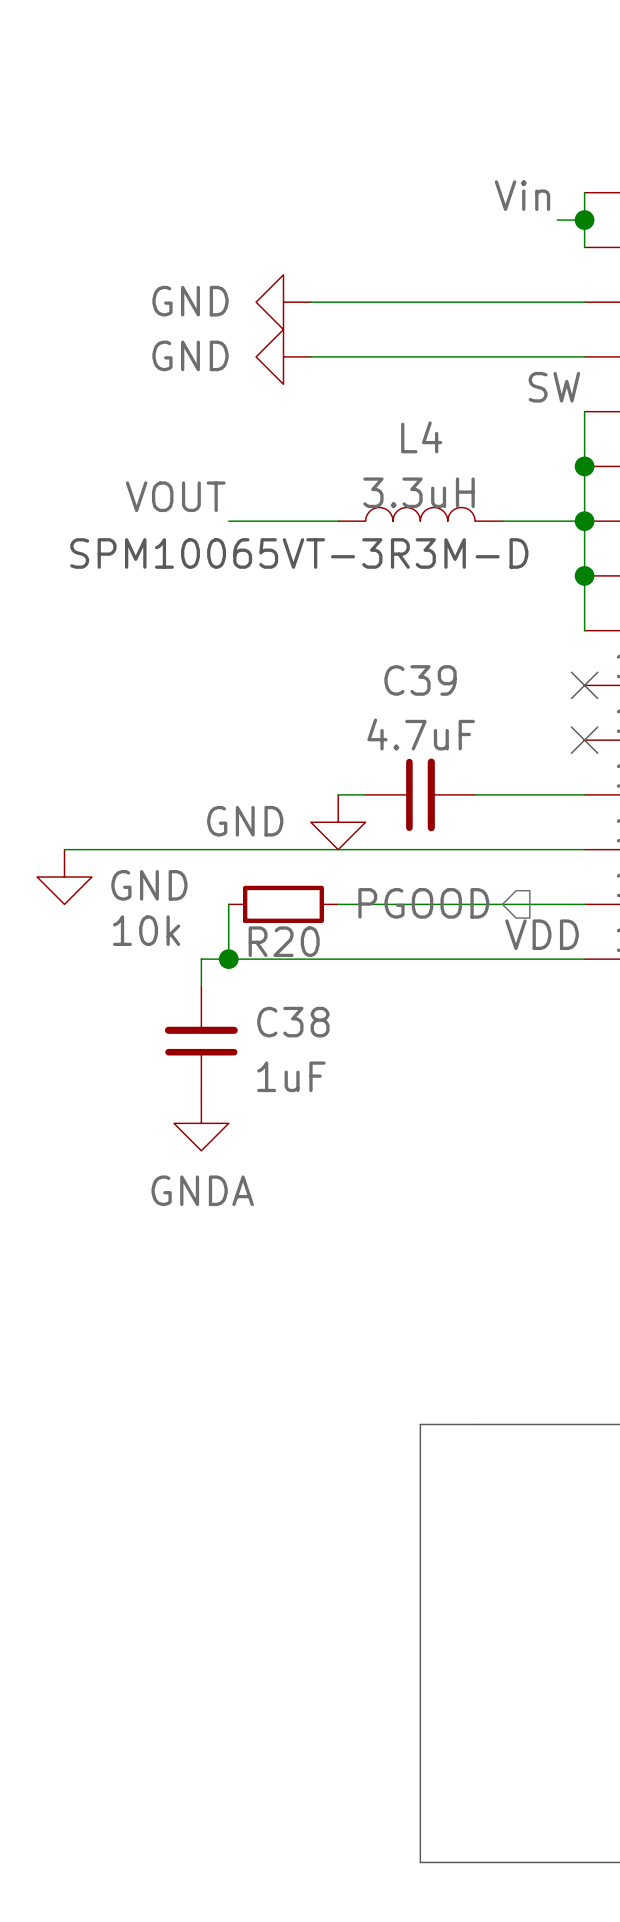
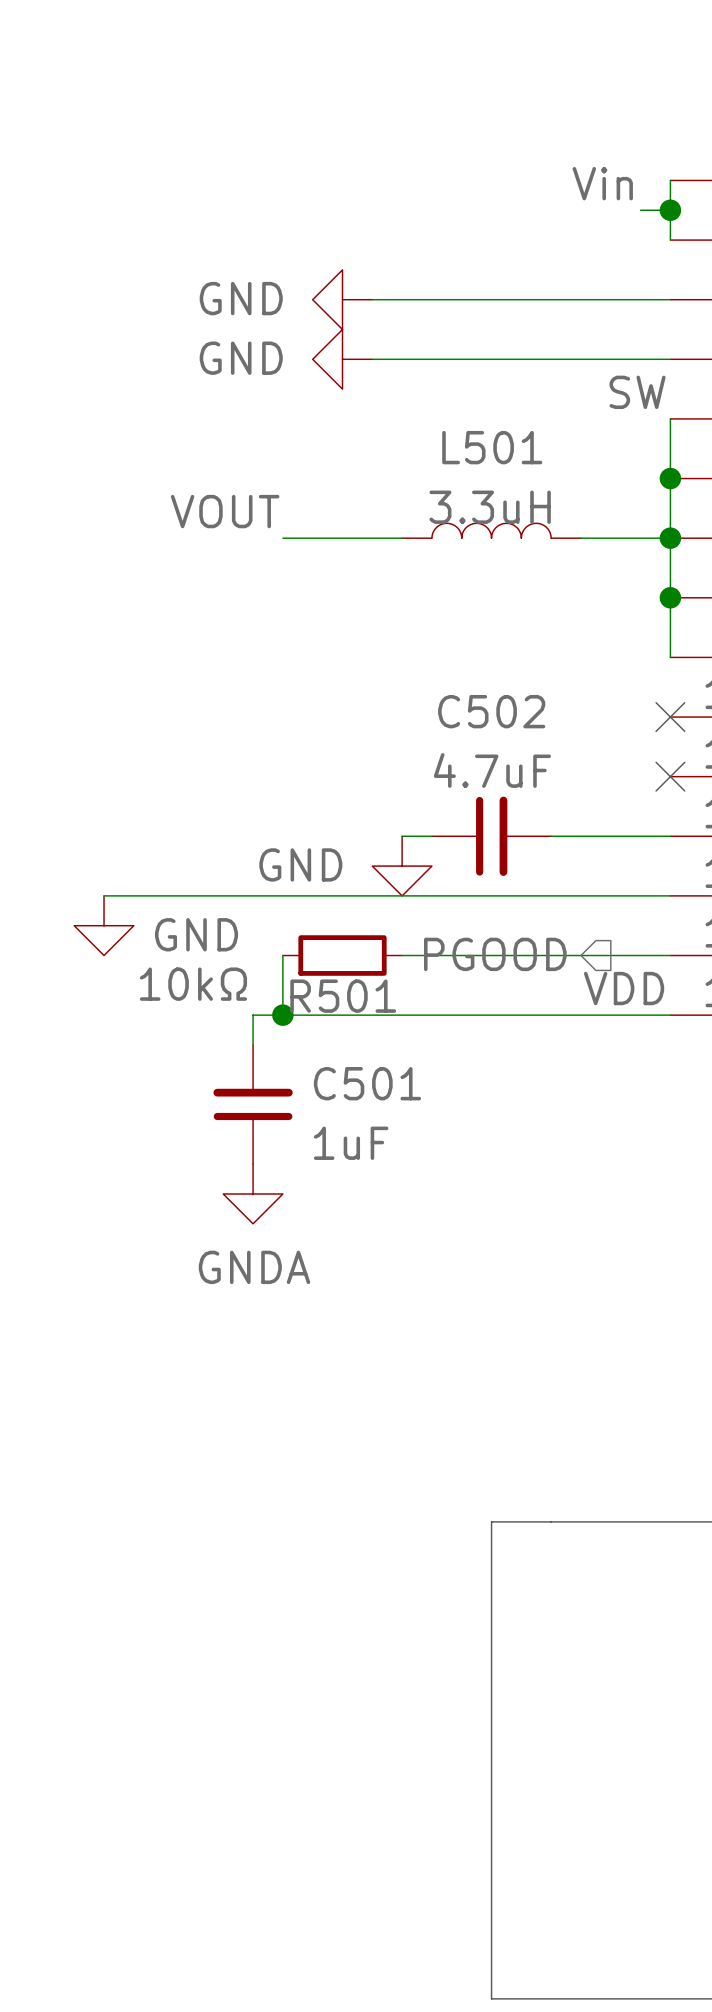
L4 name: L4 (421, 437) -> L501 (492, 447)
text: SPM10065VT-3R3M-D (299, 553) -> none
C39 name: C39 (420, 680) -> C502 (491, 711)
R20 value: 10k (146, 930) -> 10kΩ (193, 984)
R20 name: R20 (284, 941) -> R501 (343, 996)
C38 name: C38 (293, 1022) -> C501 (367, 1083)

